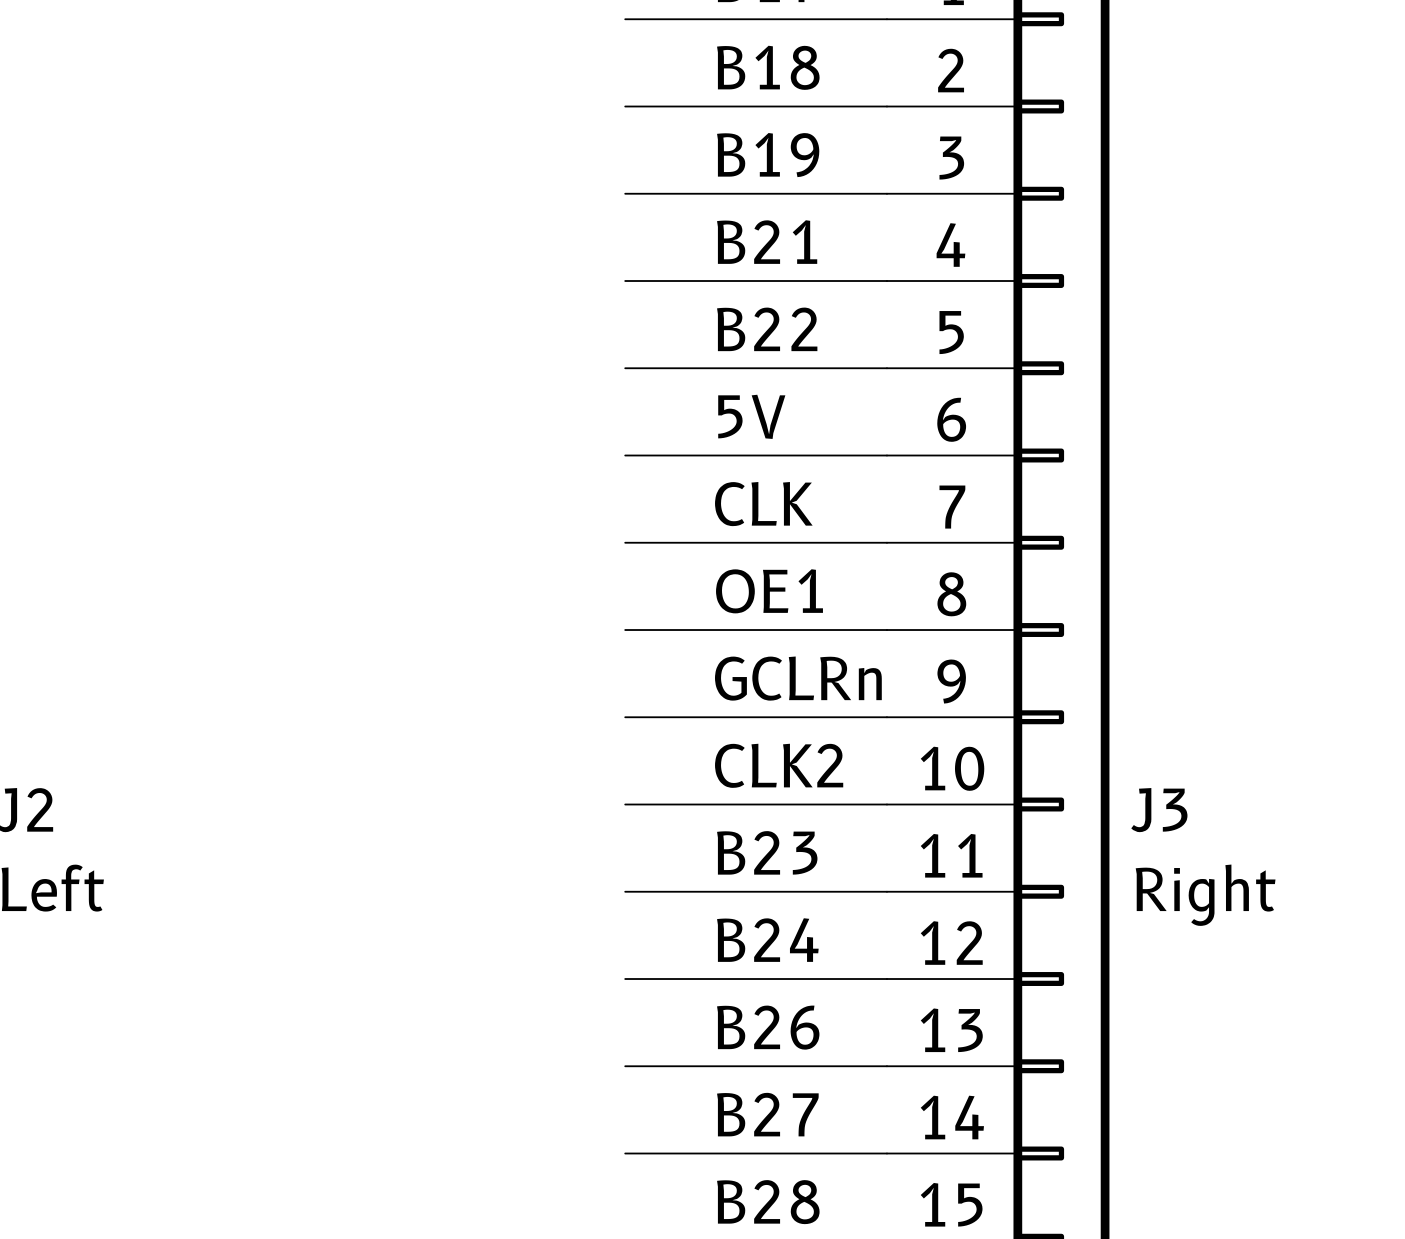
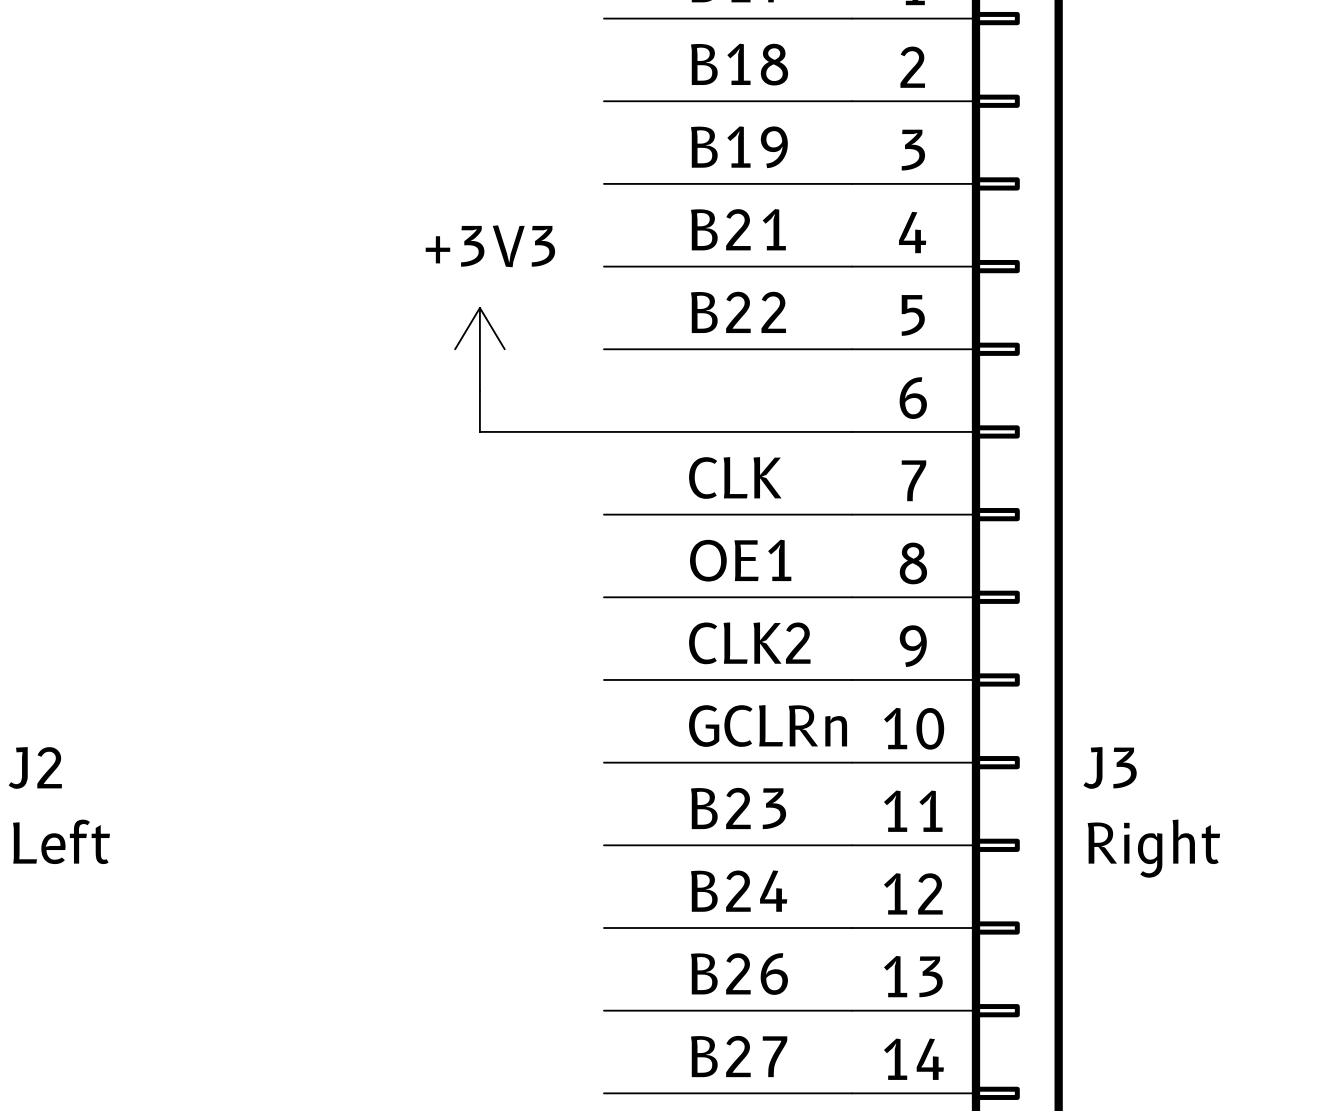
power symbol: none -> +3V3 (479, 349)
wire: none -> (479, 390) (479, 431) (603, 431)
label: 5V (751, 416) -> none
label: GCLRn (798, 678) -> CLK2 (749, 643)
label: CLK2 (779, 765) -> GCLRn (768, 725)

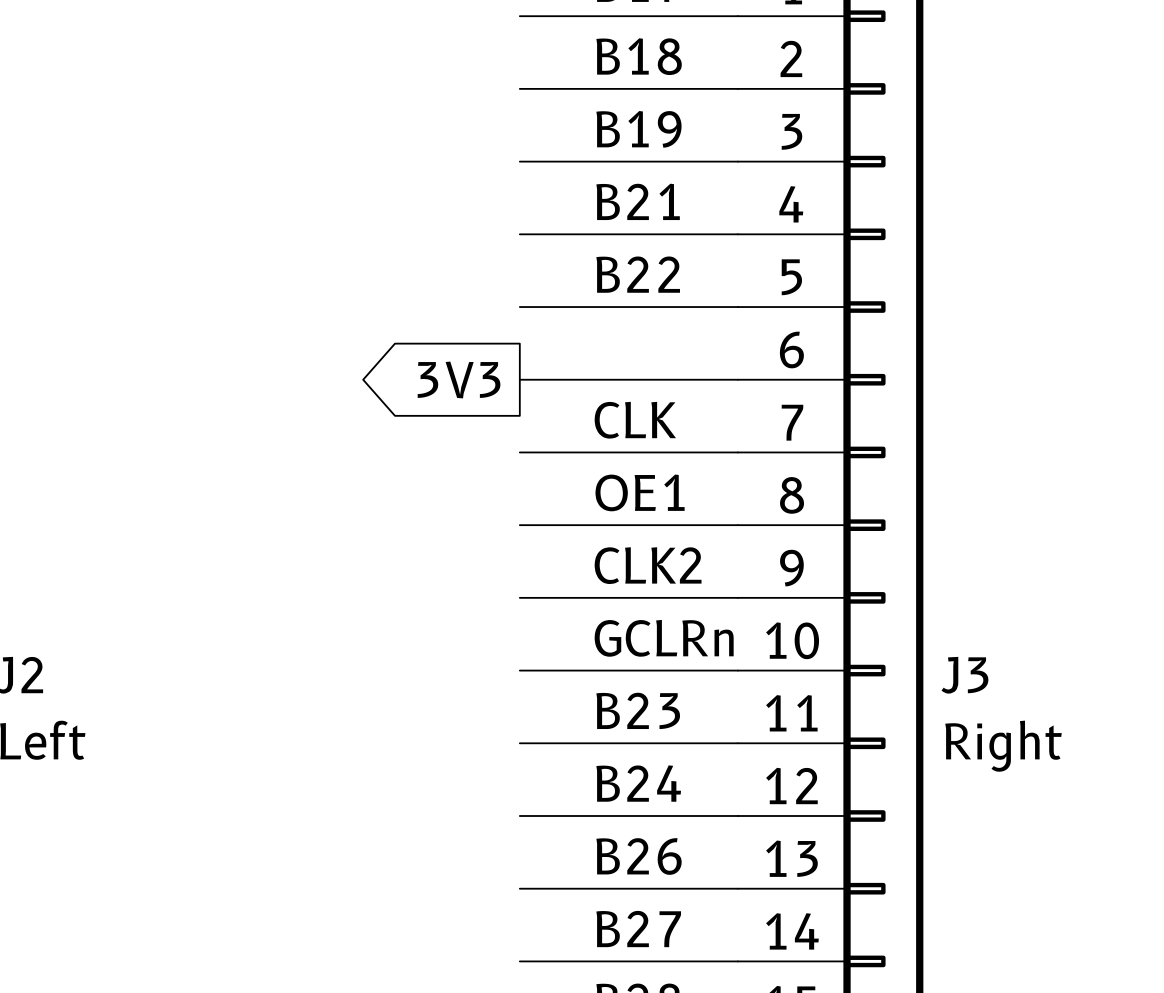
power symbol: +3V3 (479, 349) -> none
wire: (479, 390) (479, 431) (603, 431) -> none
global label: none -> 3V3 (459, 379)

